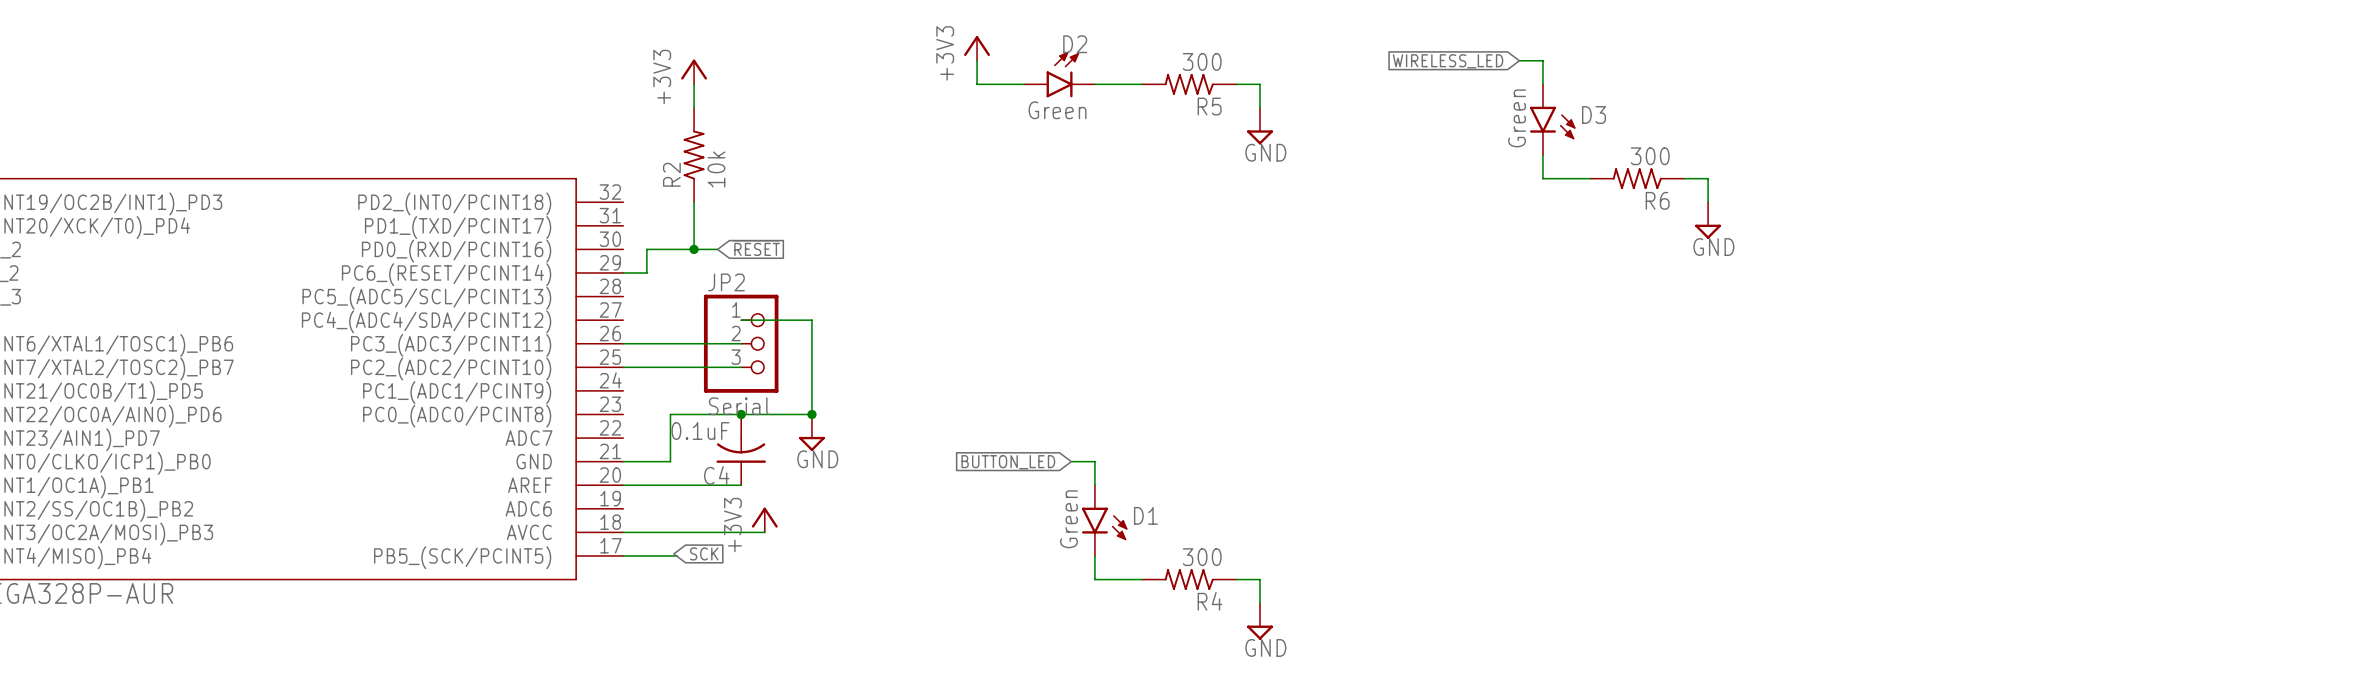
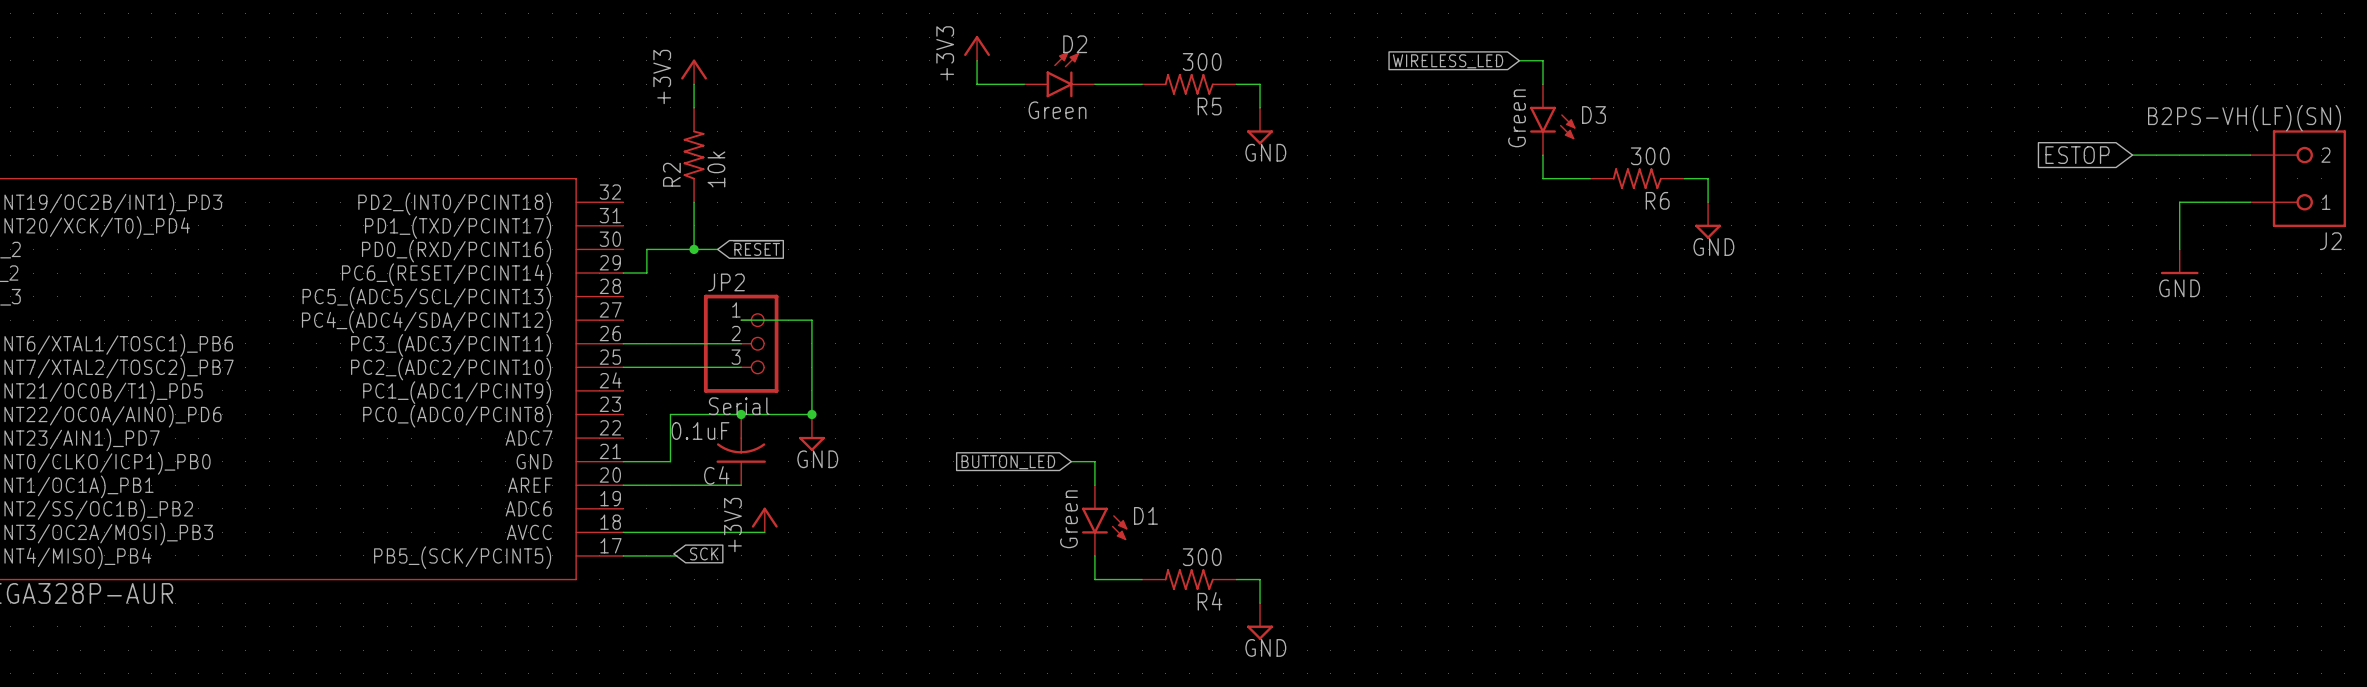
global label: none -> ESTOP (2077, 155)
wire: none -> (2132, 155) (2250, 155)
J2: none -> B2PS-VH(LF)(SN) (2298, 178)
wire: none -> (2250, 202) (2179, 202) (2179, 249)
power symbol: none -> GND (2179, 261)

